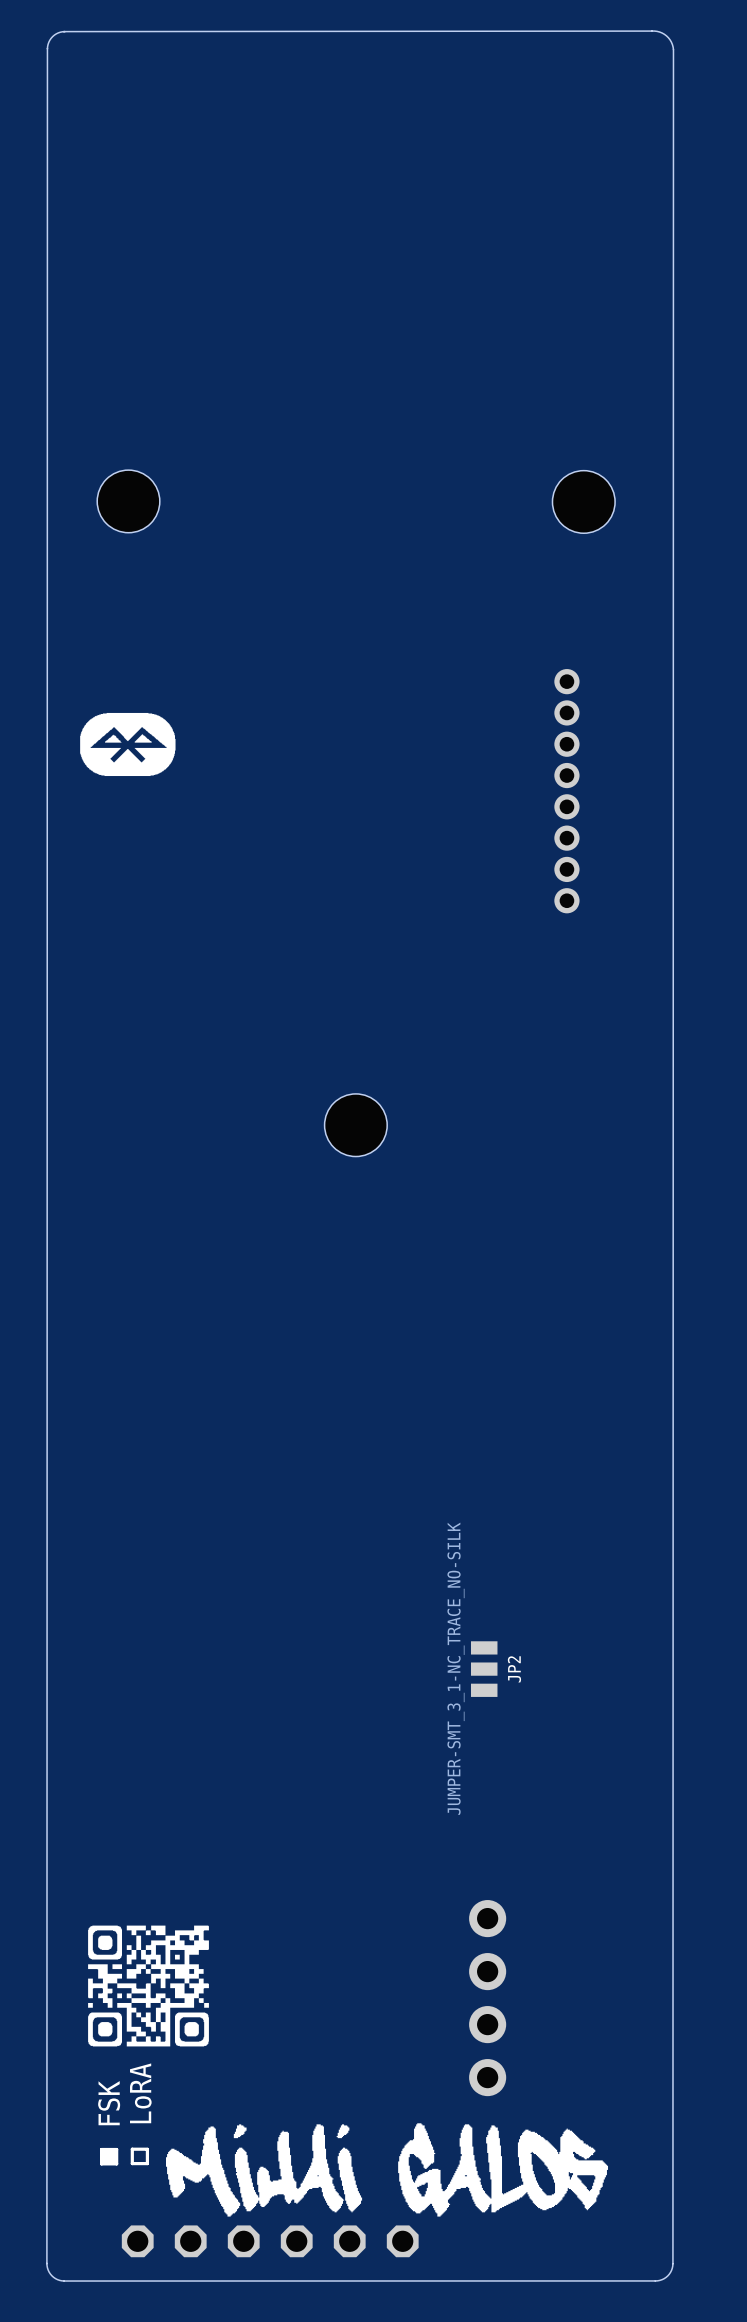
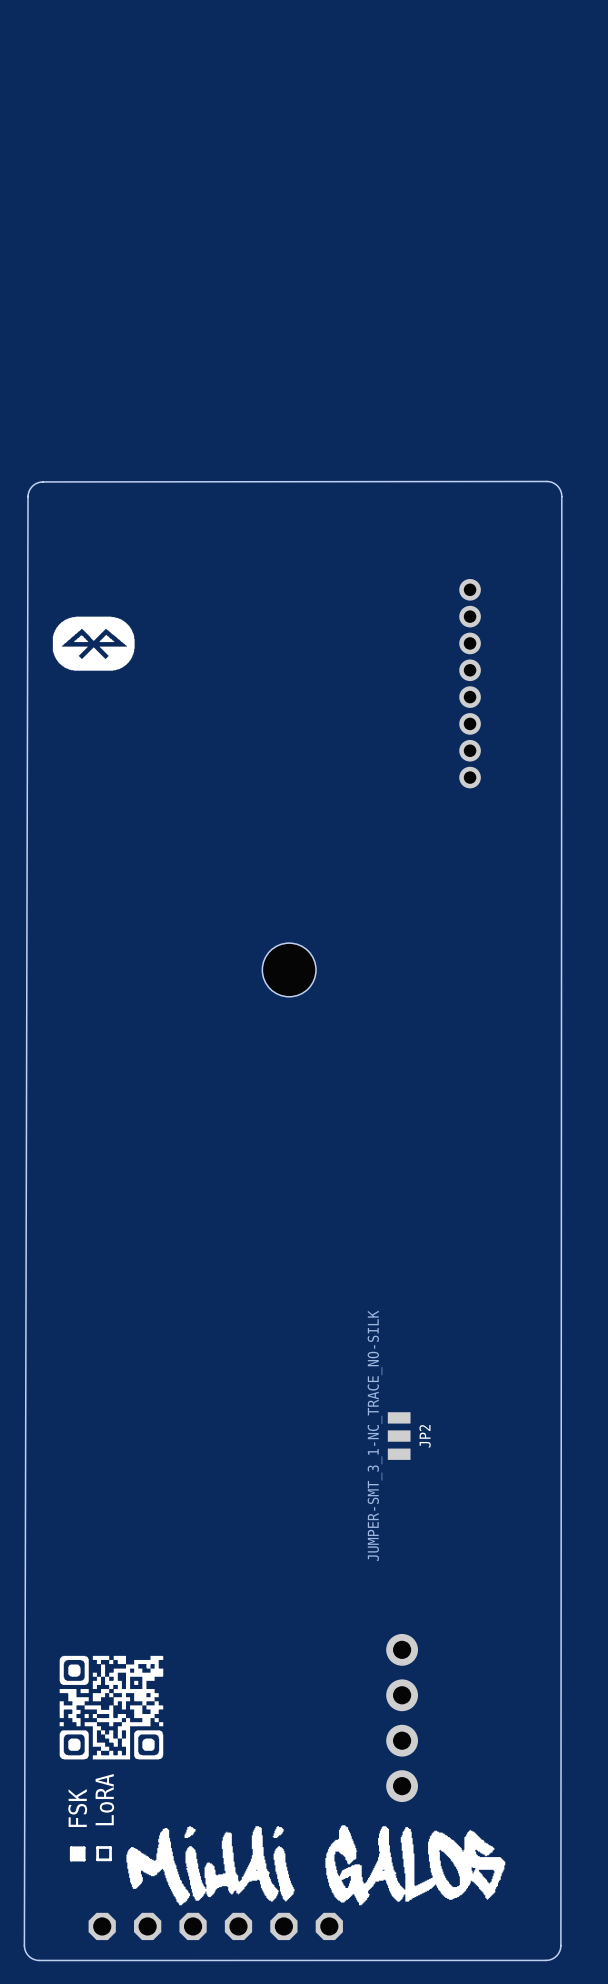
board edge: (64, 31) (52, 36) (47, 48) -> none
board edge: (651, 31) (659, 32) (666, 35) (671, 42) (673, 49) (672, 2263) -> (546, 481) (557, 485) (561, 496) (560, 1945)
board edge: (652, 31) (63, 31) -> none
board edge: (47, 48) (46, 2263) -> (28, 496) (24, 1945)
hole: (128, 501) -> none
hole: (583, 501) -> none
board edge: none -> (43, 481) (32, 486) (28, 496)
board edge: none -> (547, 481) (42, 481)

